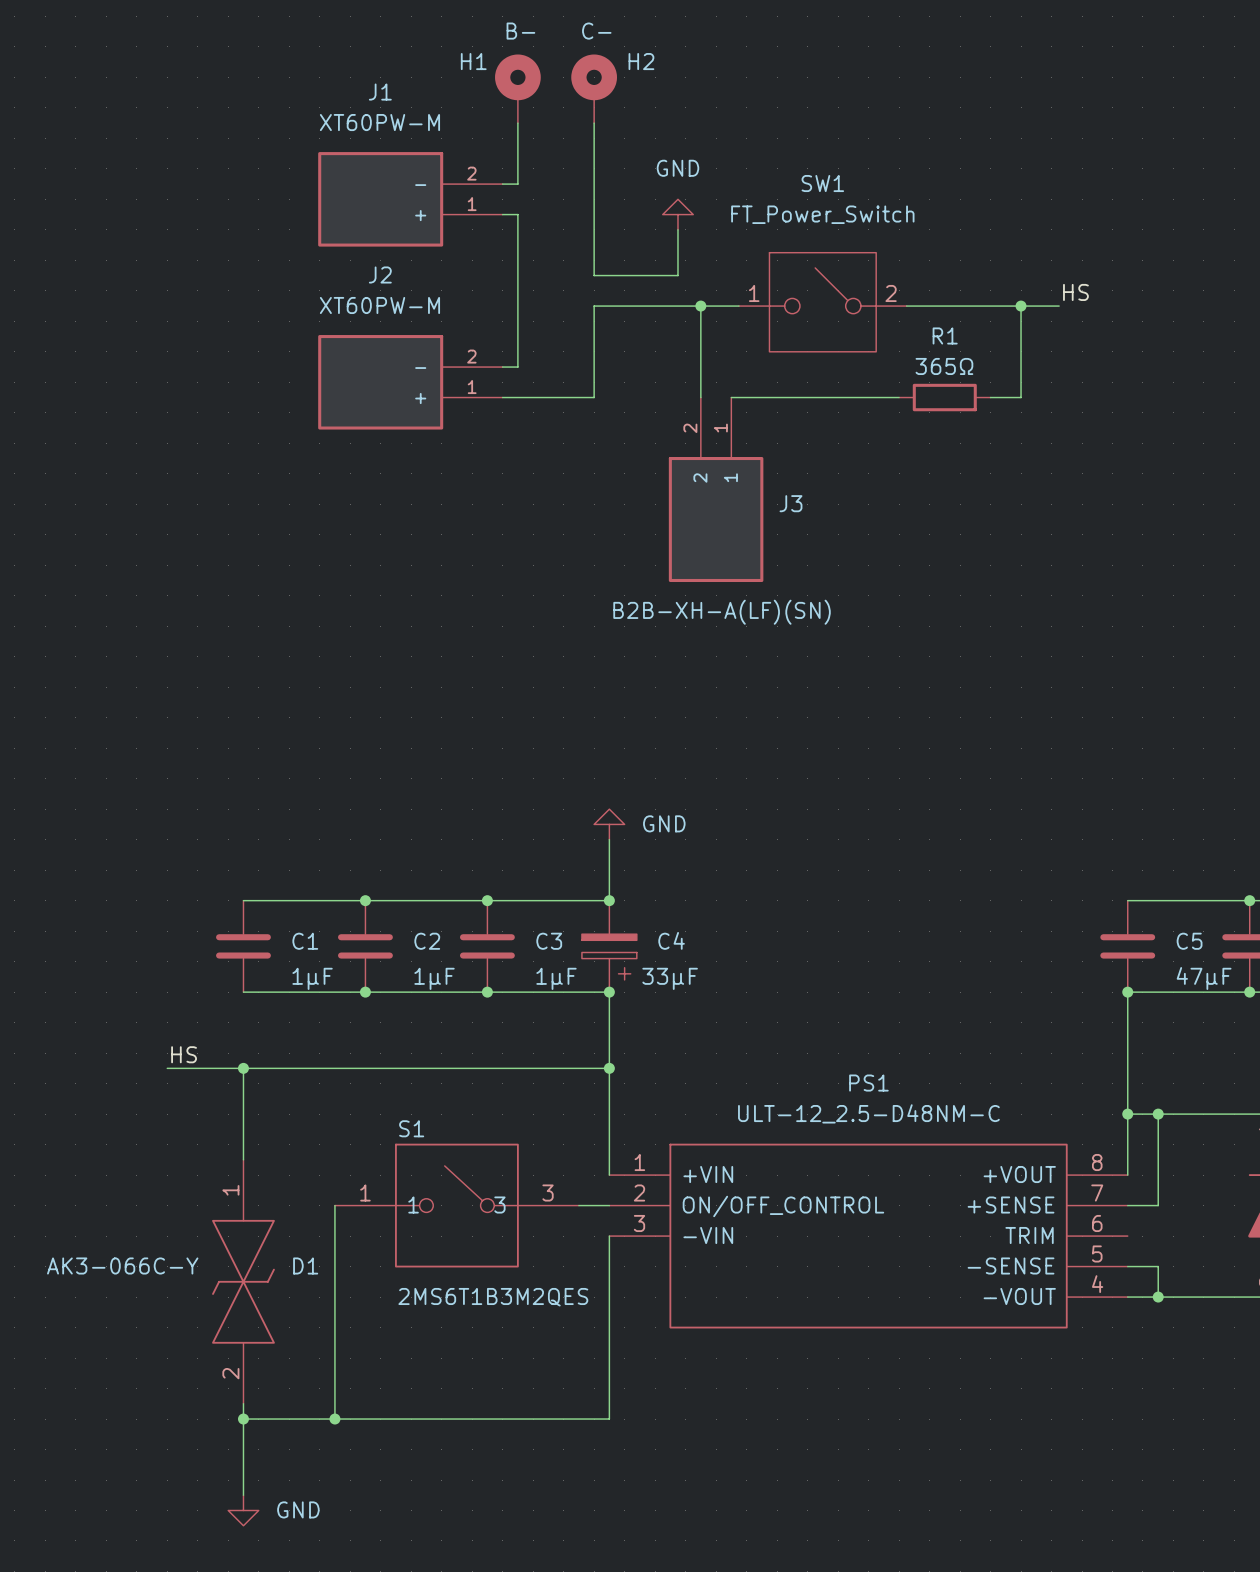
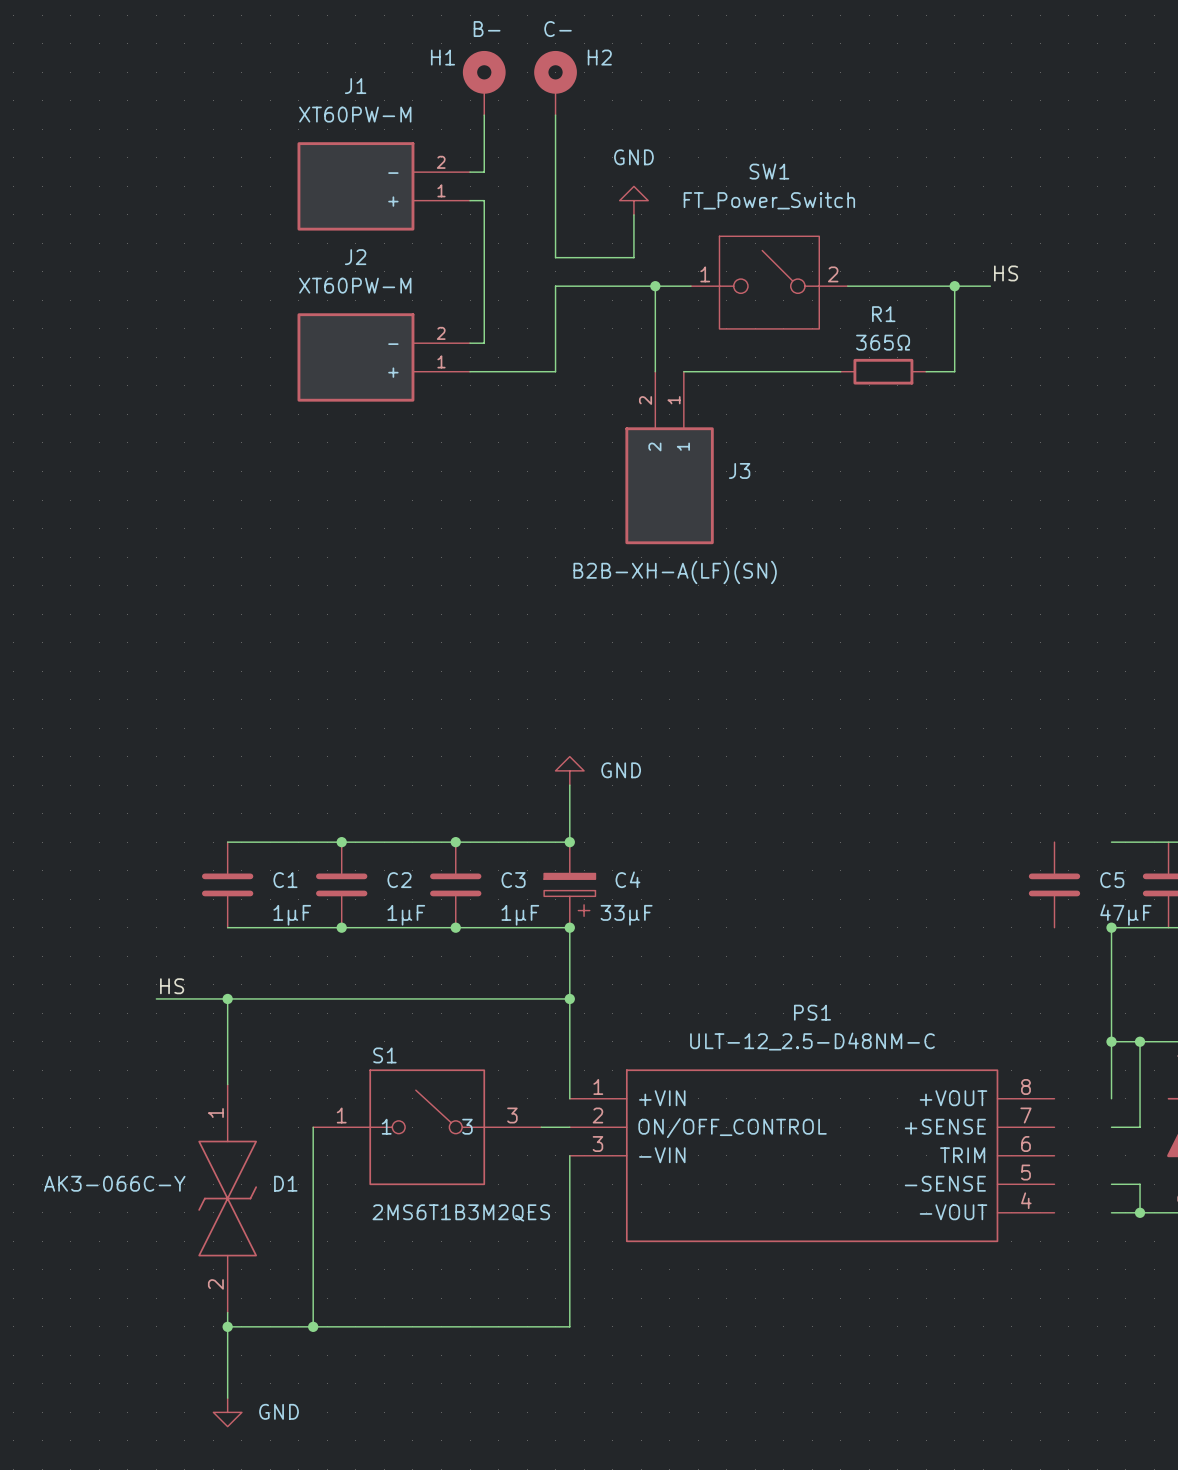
wire: (1127, 900) (1188, 900) -> none
junction: (1249, 900) -> none
junction: (1127, 992) -> none
wire: (1188, 992) (1127, 992) (1127, 1175) -> (1111, 927) (1111, 1098)
junction: none -> (1111, 927)
junction: (1249, 992) -> none
wire: (1127, 1114) (1188, 1114) -> none
junction: (1127, 1114) -> none
wire: (1158, 1114) (1158, 1205) (1127, 1205) -> (1140, 1041) (1140, 1127) (1111, 1127)
junction: (1158, 1114) -> none
junction: none -> (1111, 1041)
junction: none -> (1140, 1041)
wire: (1127, 1266) (1158, 1266) (1158, 1297) -> (1111, 1184) (1140, 1184) (1140, 1212)
wire: (1127, 1297) (1188, 1297) -> none
junction: (1158, 1297) -> none
junction: none -> (1140, 1212)

